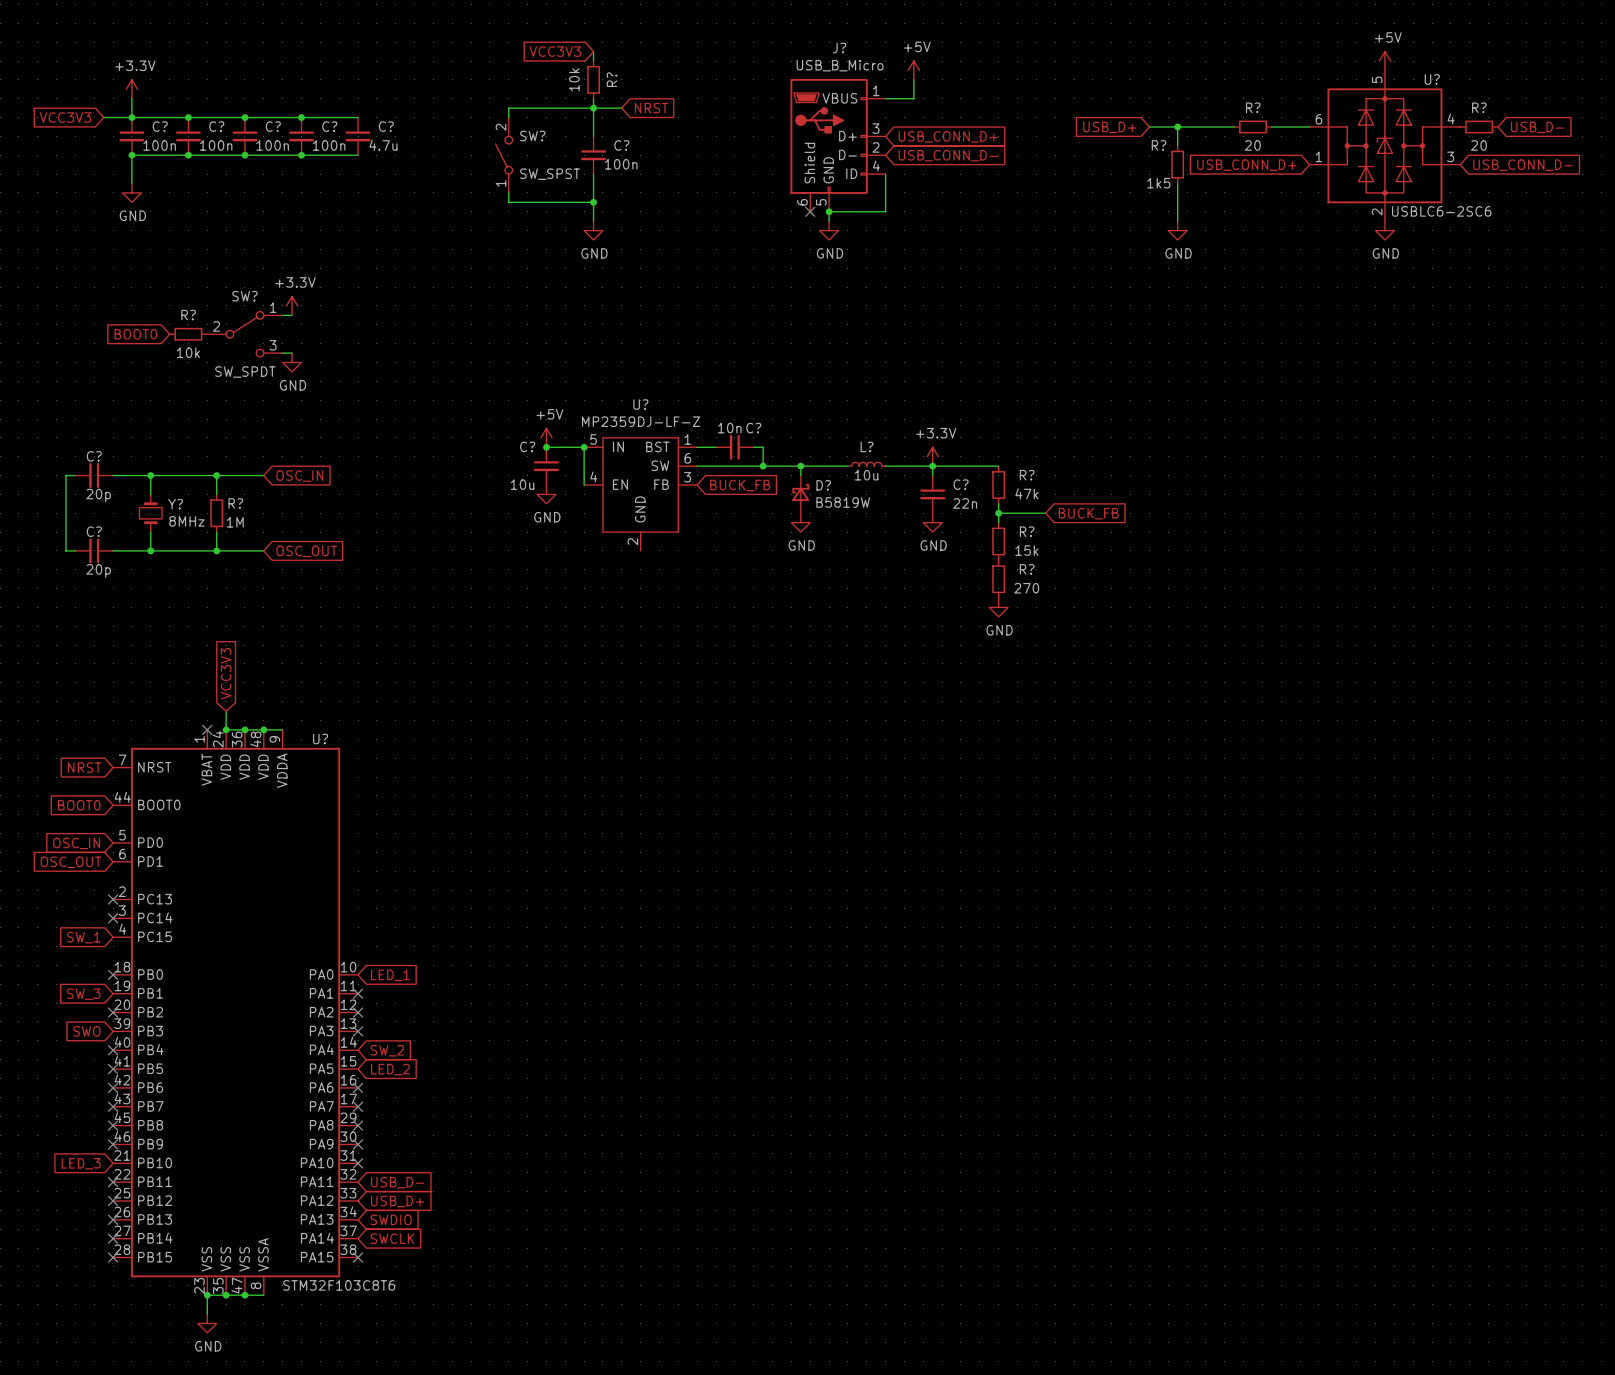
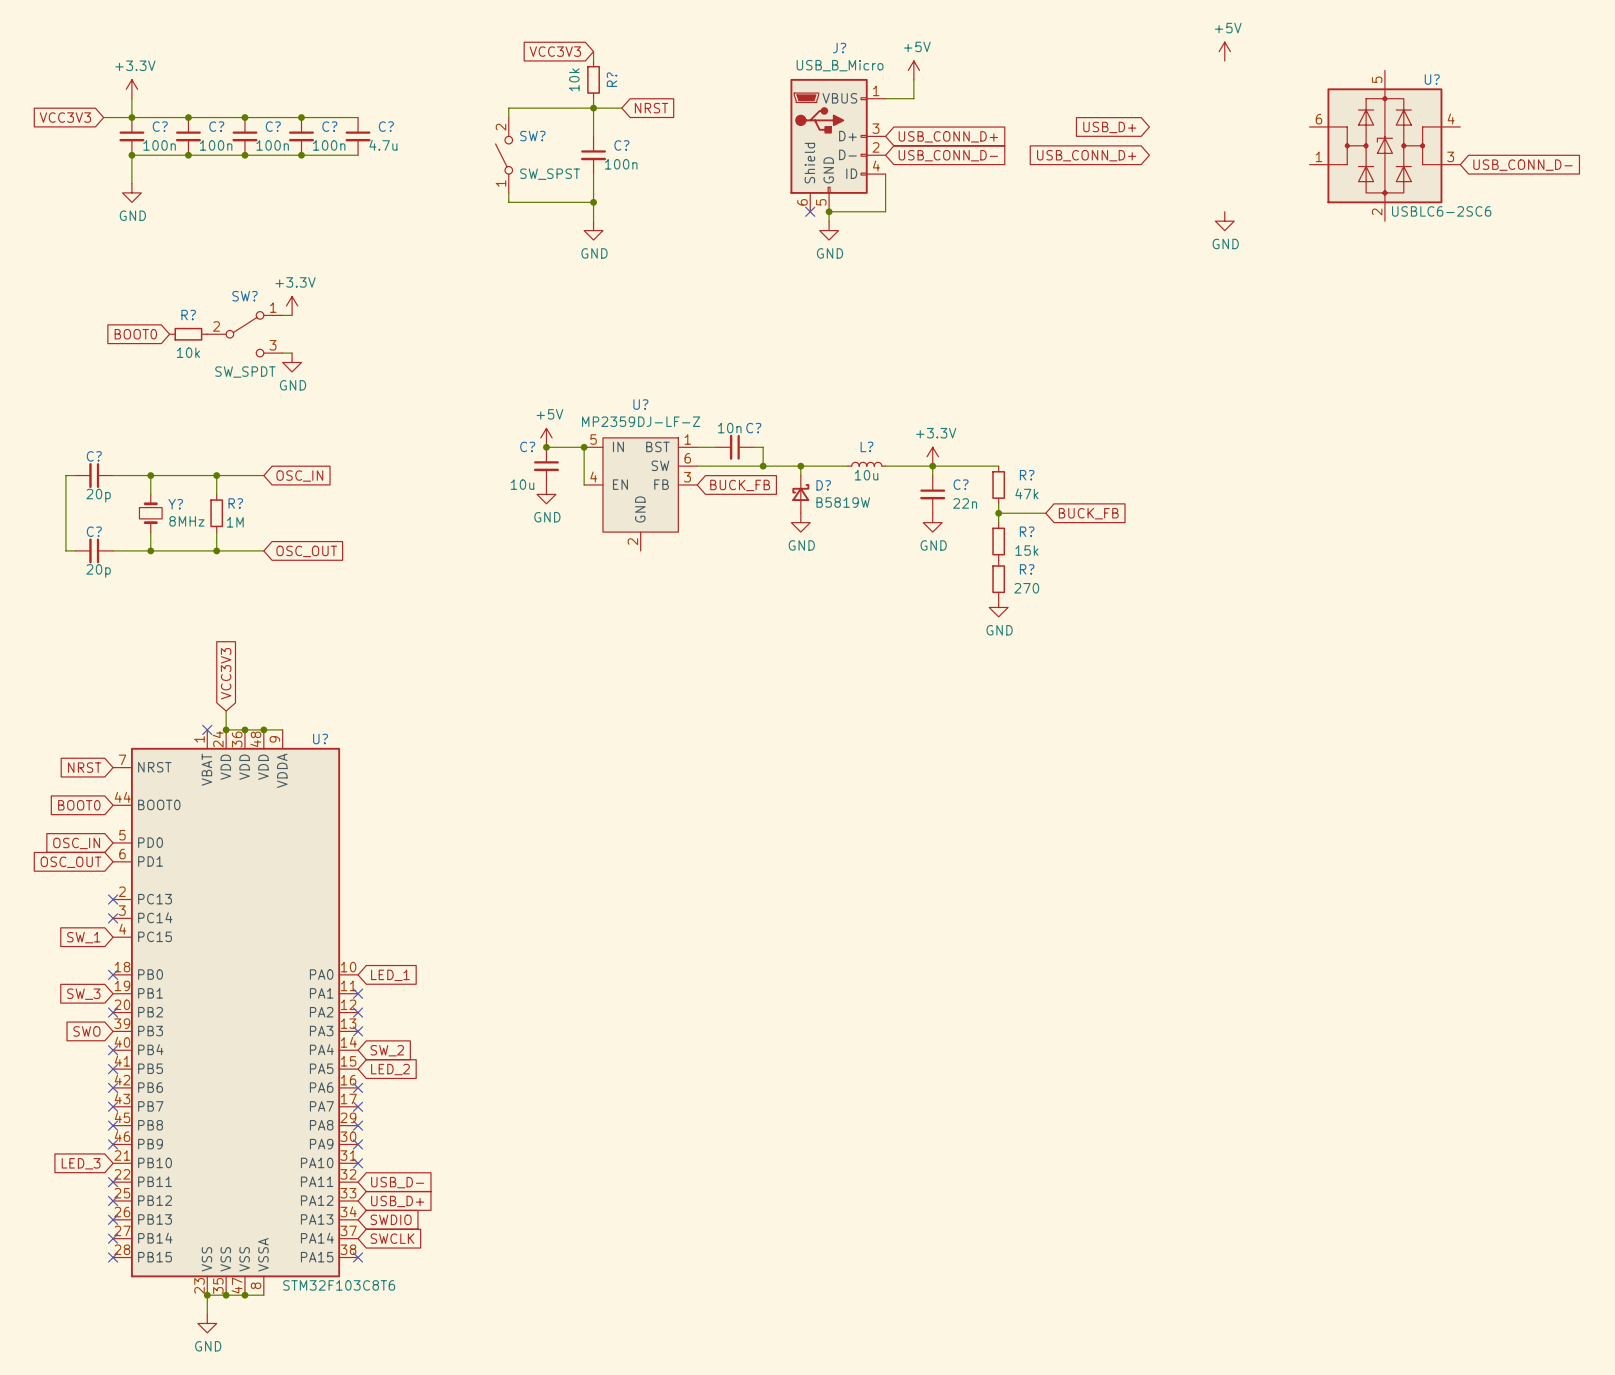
power symbol position: +5V (1384, 61) -> +5V (1224, 51)
wire: (1149, 126) (1234, 126) -> none
wire: (1177, 126) (1177, 145) -> none
junction: (1177, 126) -> none
R?: 20 (1253, 126) -> none
wire: (1271, 126) (1309, 126) -> none
R?: 20 (1479, 126) -> none
global label: USB_D- (1537, 127) -> none
R?: 1k5 (1177, 164) -> none
global label position: USB_CONN_D+ (1246, 165) -> USB_CONN_D+ (1086, 155)
wire: (1177, 183) (1177, 221) -> none
power symbol position: GND (1177, 230) -> GND (1224, 221)
power symbol: GND (1384, 230) -> none

